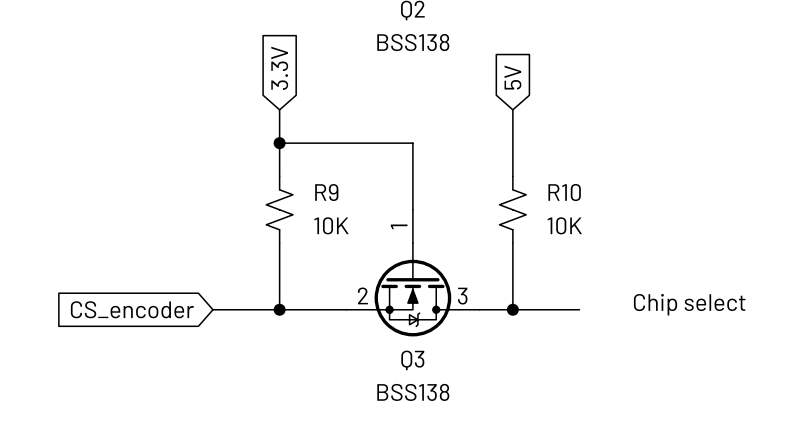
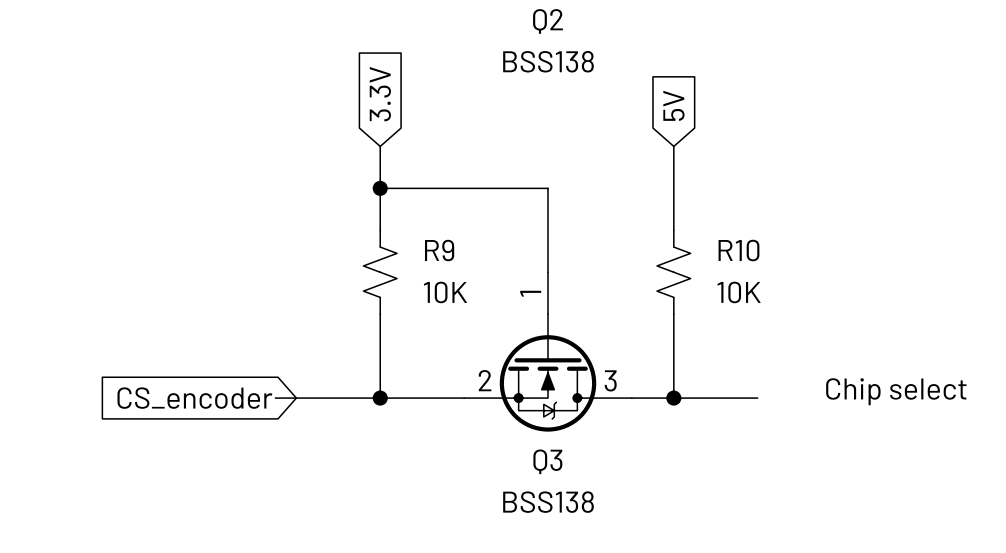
wire: none -> (275, 398) (296, 398)

